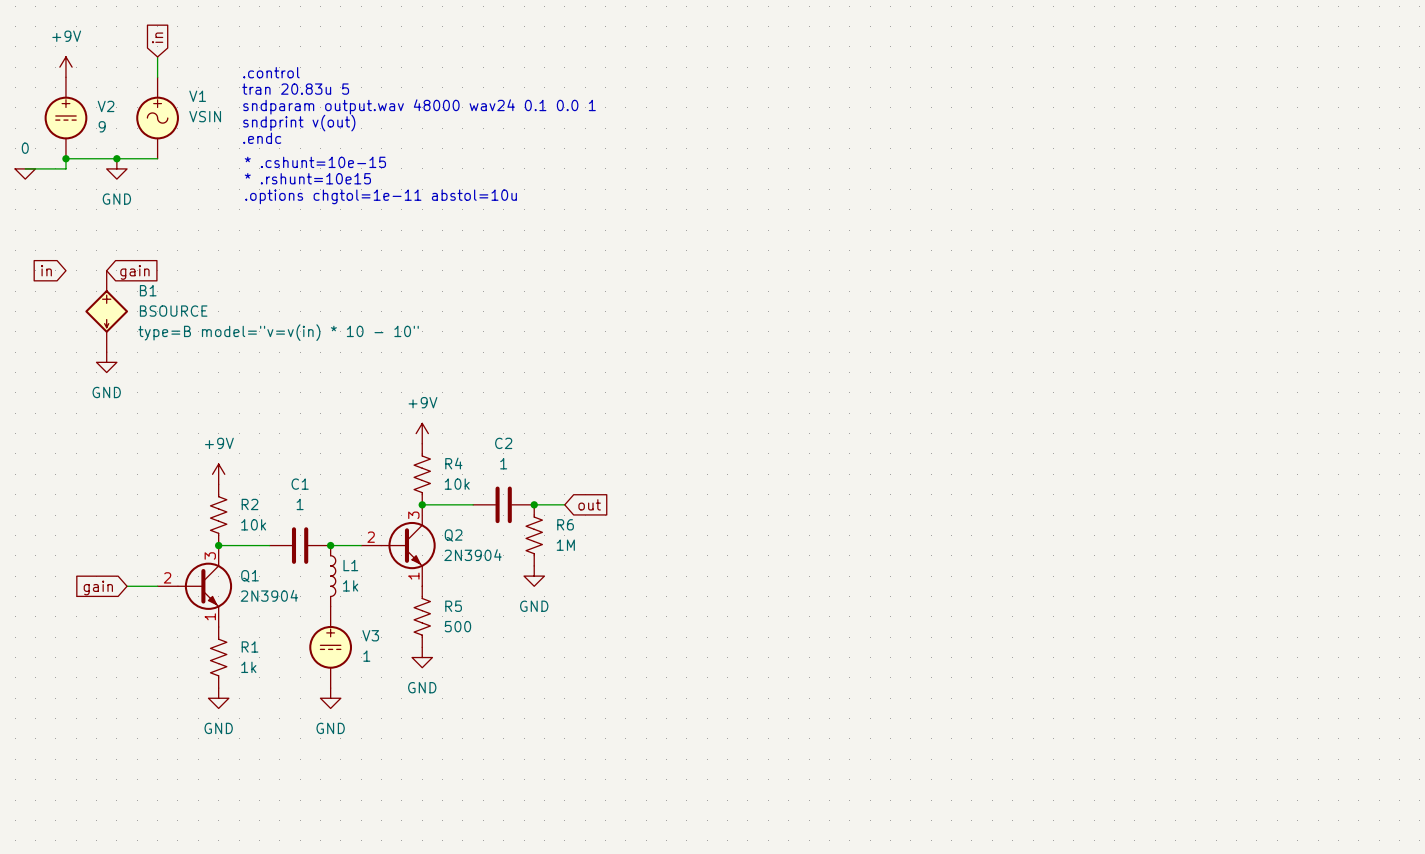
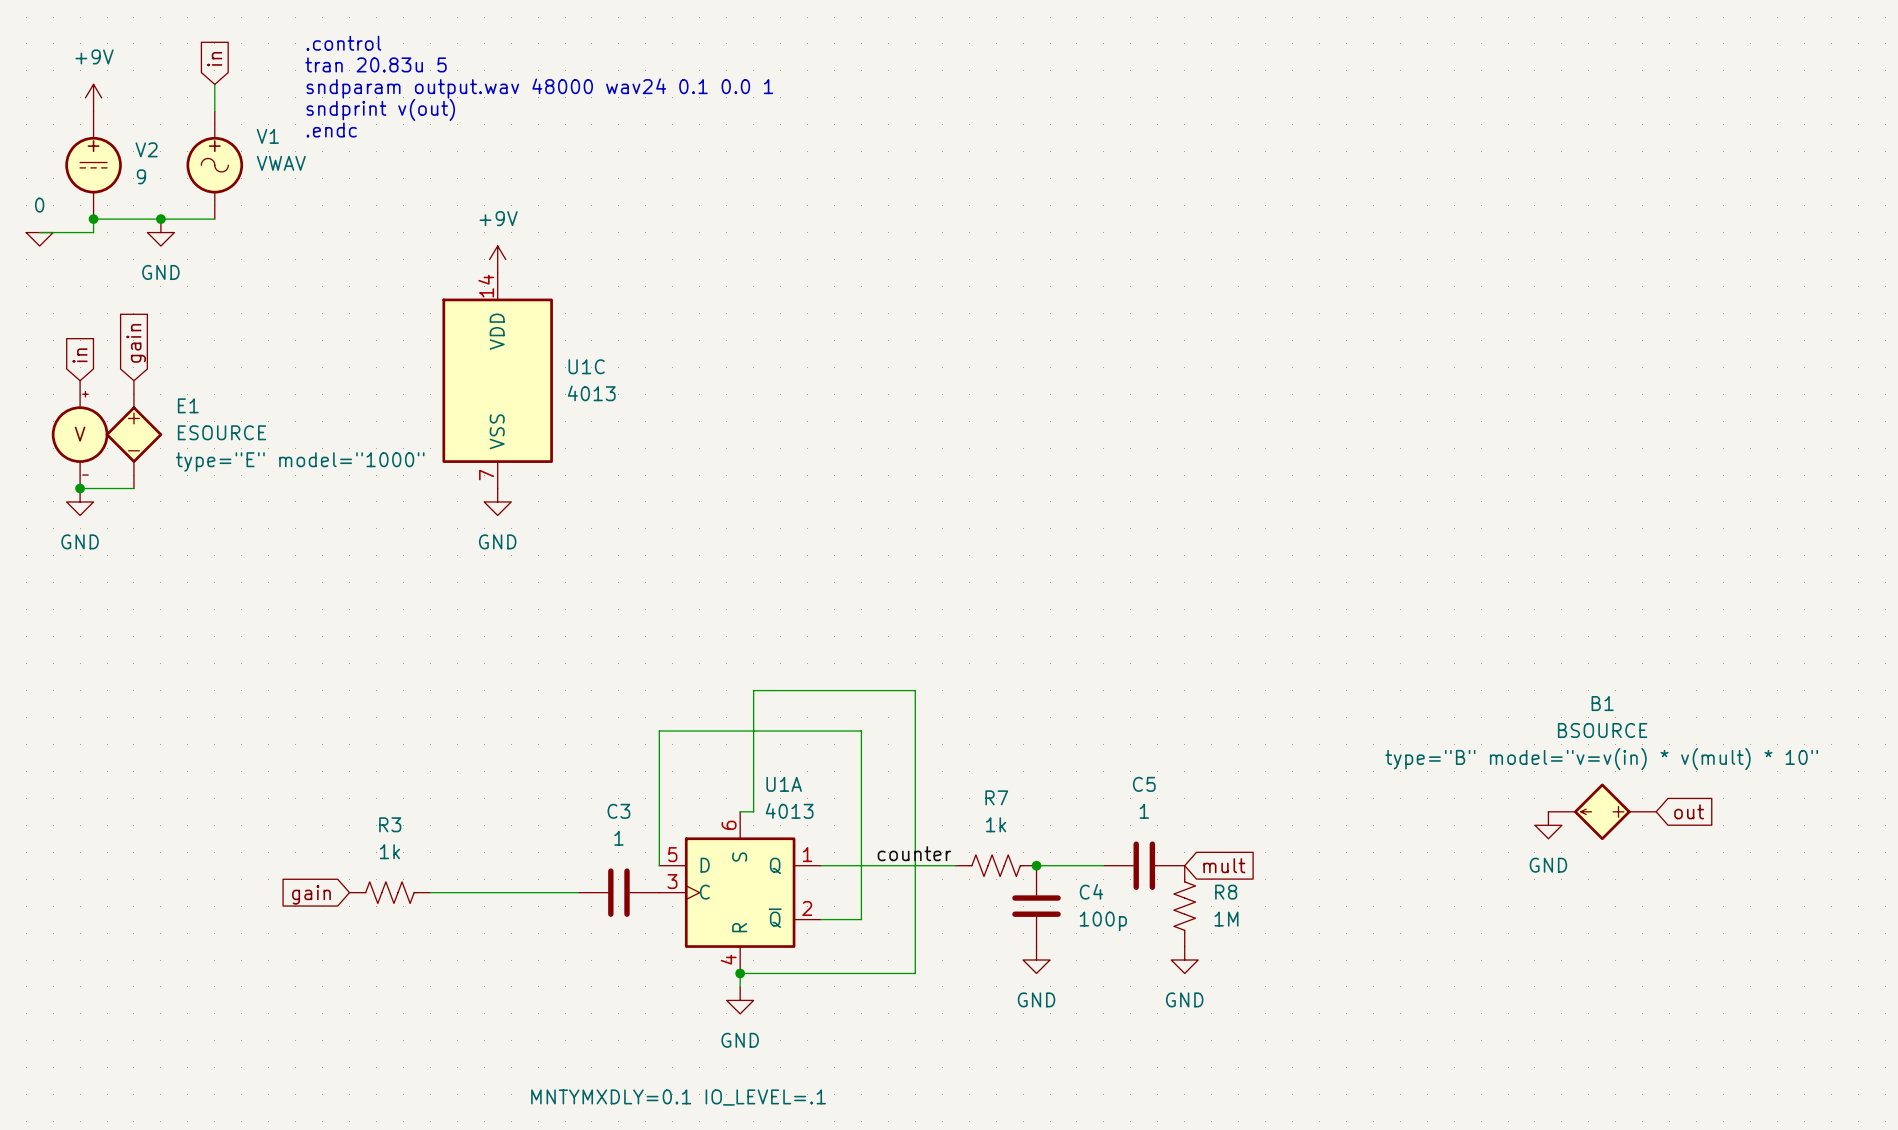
text position: .control (271, 72) -> .control (343, 43)
text position: tran 20.83u 5 (295, 89) -> tran 20.83u 5 (375, 64)
text position: sndparam output.wav 48000 wav24 0.1 0.0 1 (419, 106) -> sndparam output.wav 48000 wav24 0.1 0.0 1 (539, 88)
V1 value: VSIN (205, 116) -> VWAV (281, 163)
text position: sndprint v(out) (299, 123) -> sndprint v(out) (380, 109)
text position: .endc (262, 138) -> .endc (331, 129)
text: * .cshunt=10e-15 (315, 162) -> none
text: * .rshunt=10e15 (307, 178) -> none
power symbol: none -> +9V (497, 259)
text: .options chgtol=1e-11 abstol=10u (381, 196) -> none
global label rotation: 0° (46, 270) -> 90° clockwise (80, 355)
global label rotation: 0° (134, 272) -> 90° counterclockwise (136, 343)
U1C: none -> 4013 (497, 380)
B1 name position: B1 (148, 290) -> B1 (1602, 703)
B1 rotation: 0° (106, 311) -> 90° clockwise (1602, 811)
B1 position: (106, 311) -> (1602, 811)
B1 value position: BSOURCE (173, 311) -> BSOURCE (1602, 730)
E1: none -> ESOURCE (107, 434)
B1 text: type=B model="v=v(in) * 10 - 10" (278, 332) -> type="B" model="v=v(in) * v(mult) * 10" (1601, 759)
wire: none -> (80, 488) (133, 488)
junction: none -> (80, 488)
power symbol position: GND (106, 362) -> GND (80, 501)
power symbol: none -> GND (497, 501)
power symbol: +9V (422, 433) -> none
power symbol: +9V (218, 474) -> none
R4: 10k (422, 474) -> none
wire: (422, 504) (473, 504) -> none
junction: (422, 504) -> none
C2: 1 (503, 504) -> none
wire: (534, 504) (564, 504) -> none
junction: (534, 504) -> none
global label: out (589, 504) -> none
R2: 10k (218, 515) -> none
R6: 1M (534, 535) -> none
wire: (218, 545) (269, 545) -> none
junction: (218, 545) -> none
C1: 1 (300, 545) -> none
wire: (330, 545) (361, 545) -> none
junction: (330, 545) -> none
Q2: 2N3904 (398, 545) -> none
L1: 1k (333, 576) -> none
power symbol: GND (534, 576) -> none
wire: (127, 586) (157, 586) -> none
Q1: 2N3904 (194, 586) -> none
global label: gain (98, 587) -> none
wire: none -> (740, 811) (753, 811) (753, 690) (915, 690) (915, 973) (740, 973) (740, 986)
global label: none -> out (1689, 811)
R5: 500 (422, 616) -> none
power symbol: none -> GND (1548, 825)
label: none -> counter (914, 853)
V3: 1 (330, 647) -> none
wire: none -> (659, 865) (659, 730) (861, 730) (861, 919) (820, 919)
wire: none -> (820, 865) (955, 865)
R7: none -> 1k (996, 865)
wire: none -> (1036, 865) (1103, 865)
junction: none -> (1036, 865)
C5: none -> 1 (1144, 865)
global label: none -> mult (1224, 865)
R1: 1k (218, 657) -> none
power symbol: GND (422, 657) -> none
R3: none -> 1k (389, 892)
wire: none -> (430, 892) (578, 892)
C3: none -> 1 (618, 892)
U1A: none -> 4013 (740, 892)
global label: none -> gain (311, 894)
C4: none -> 100p (1036, 906)
R8: none -> 1M (1184, 906)
power symbol: GND (218, 698) -> none
power symbol: GND (330, 698) -> none
power symbol: none -> GND (1036, 960)
power symbol: none -> GND (1184, 960)
junction: none -> (740, 973)
power symbol: none -> GND (740, 1000)

